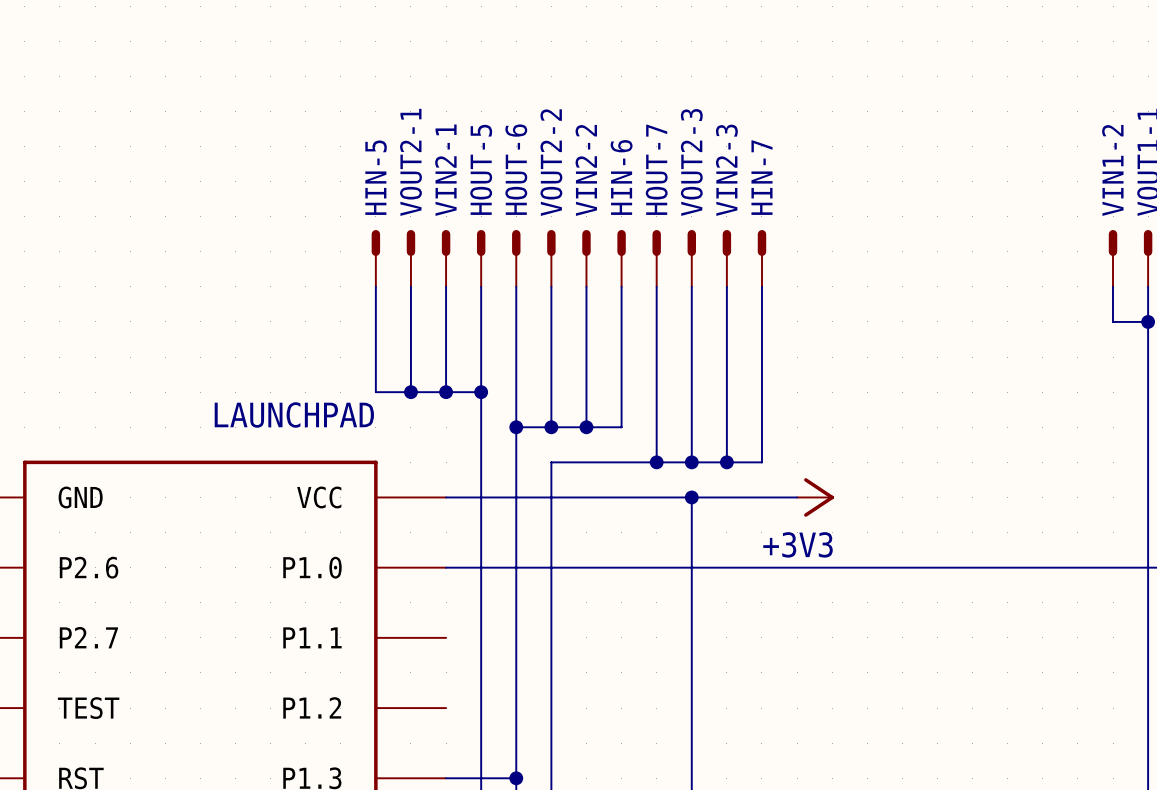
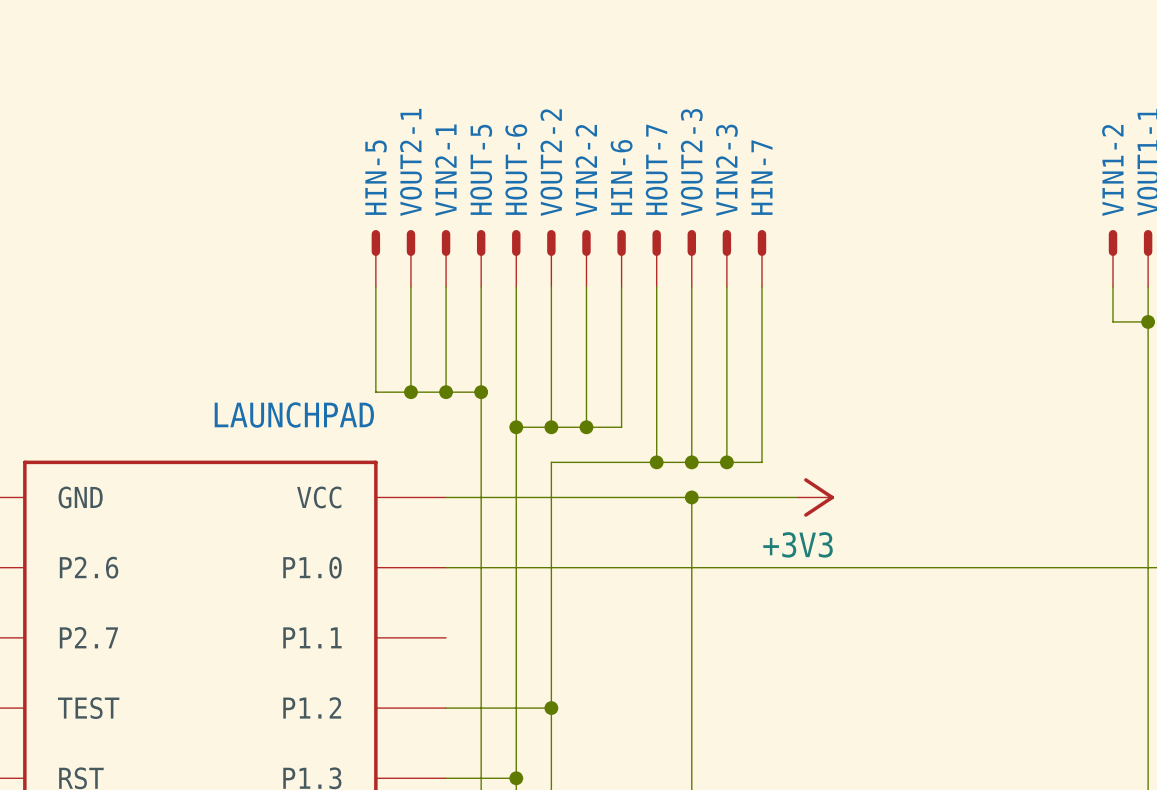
wire: none -> (446, 708) (551, 708)
junction: none -> (551, 708)

